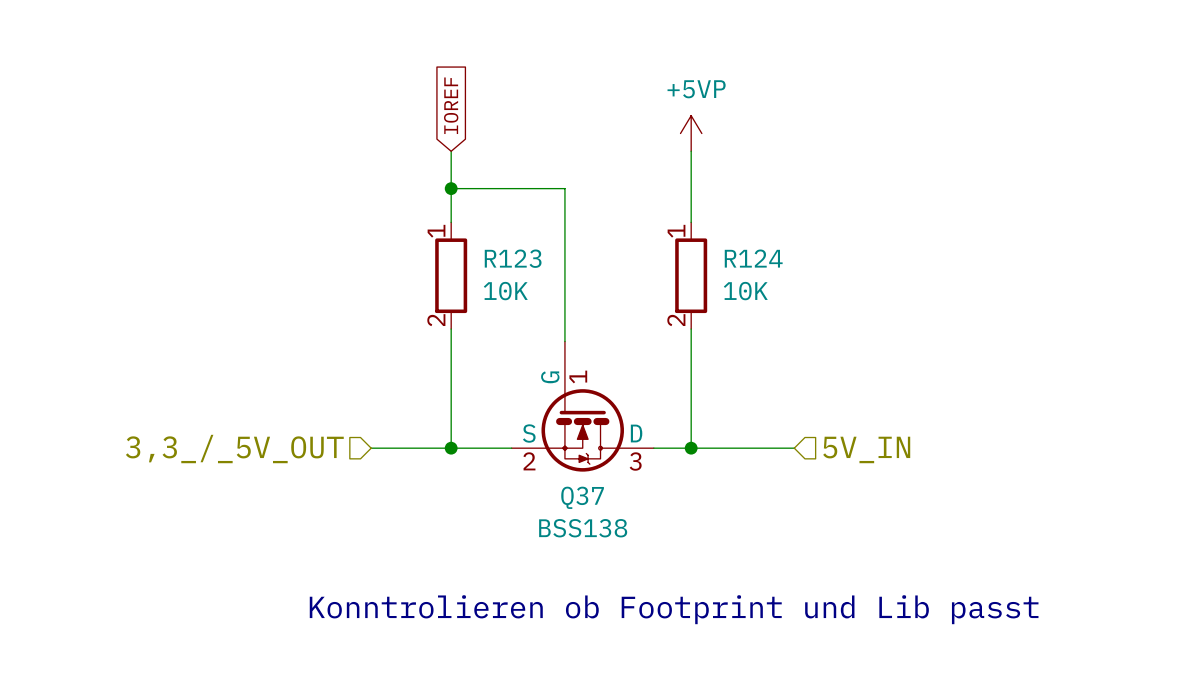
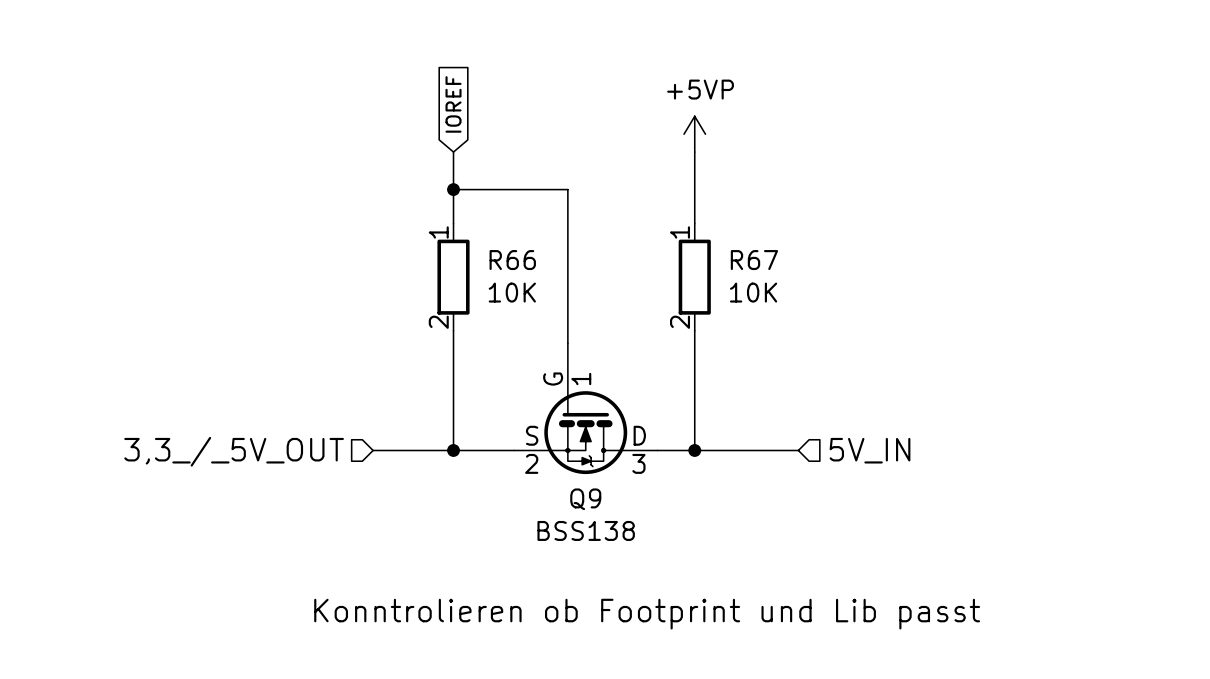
R123 name: R123 (513, 258) -> R66 (512, 260)
R124 name: R124 (753, 258) -> R67 (754, 260)
Q37 name: Q37 (582, 497) -> Q9 (585, 499)

